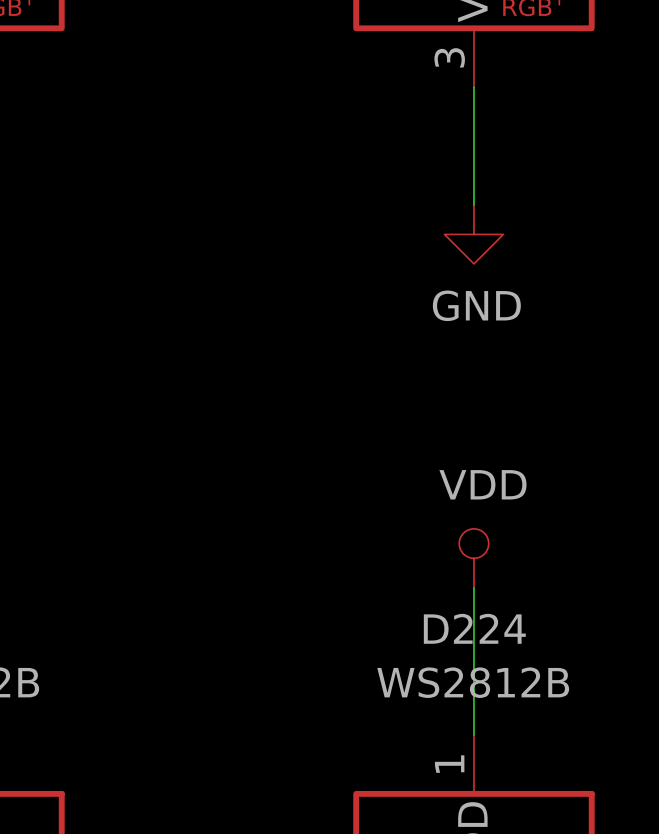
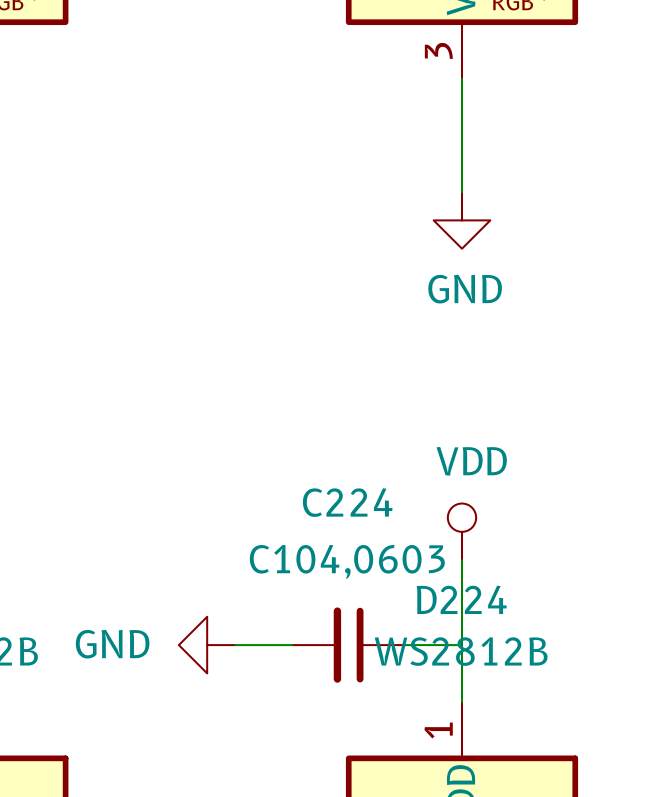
power symbol: none -> GND (207, 645)
wire: none -> (235, 645) (292, 645)
C224: none -> C104,0603 (348, 645)
wire: none -> (405, 645) (462, 645)

